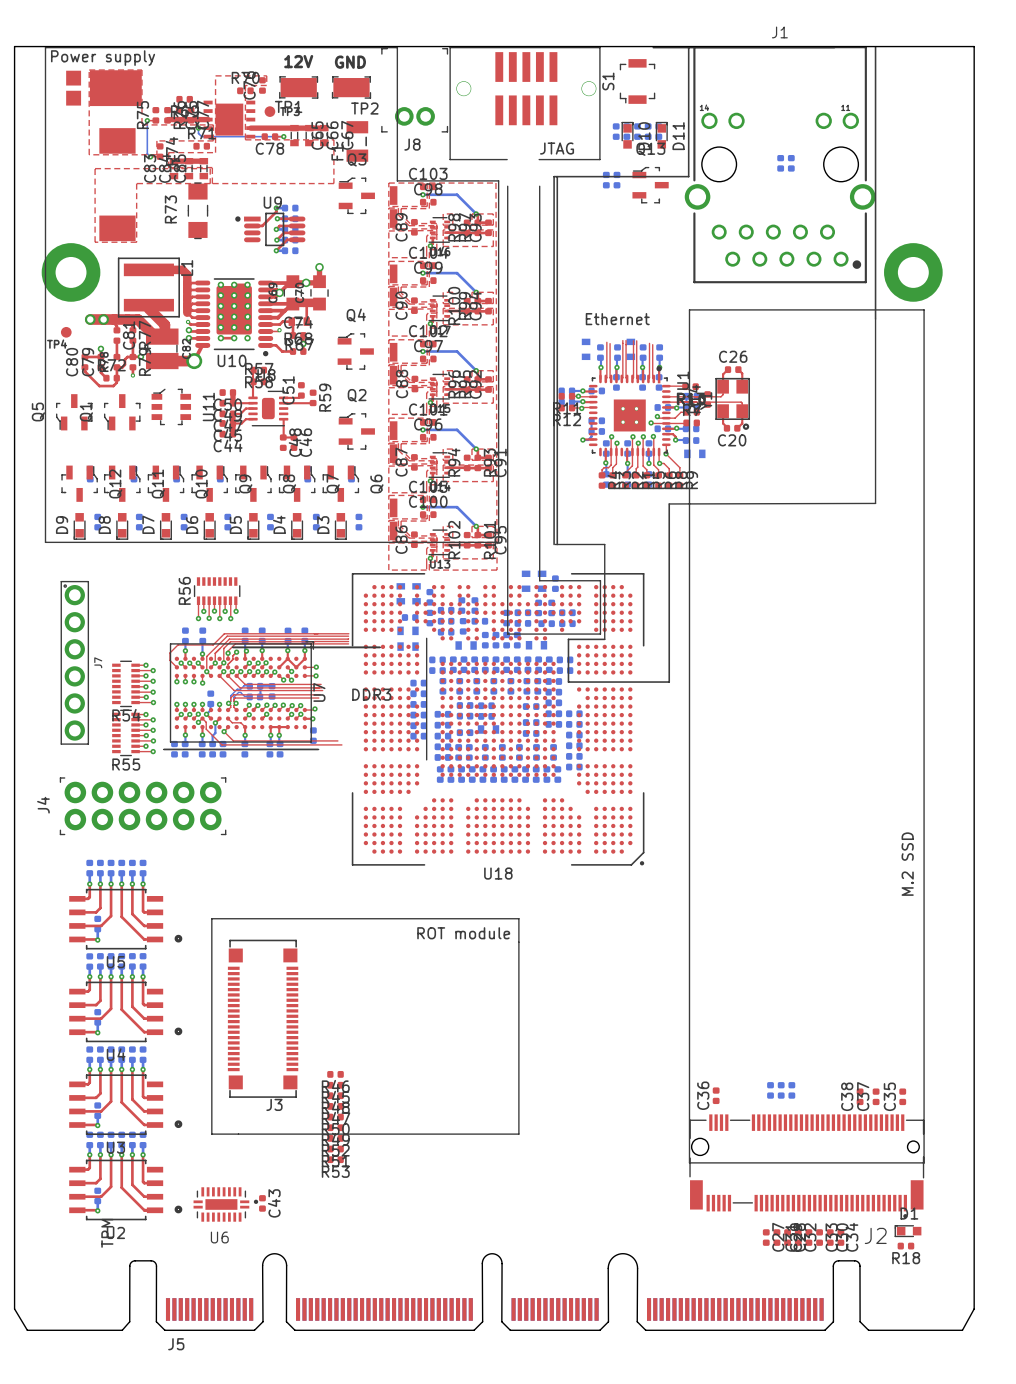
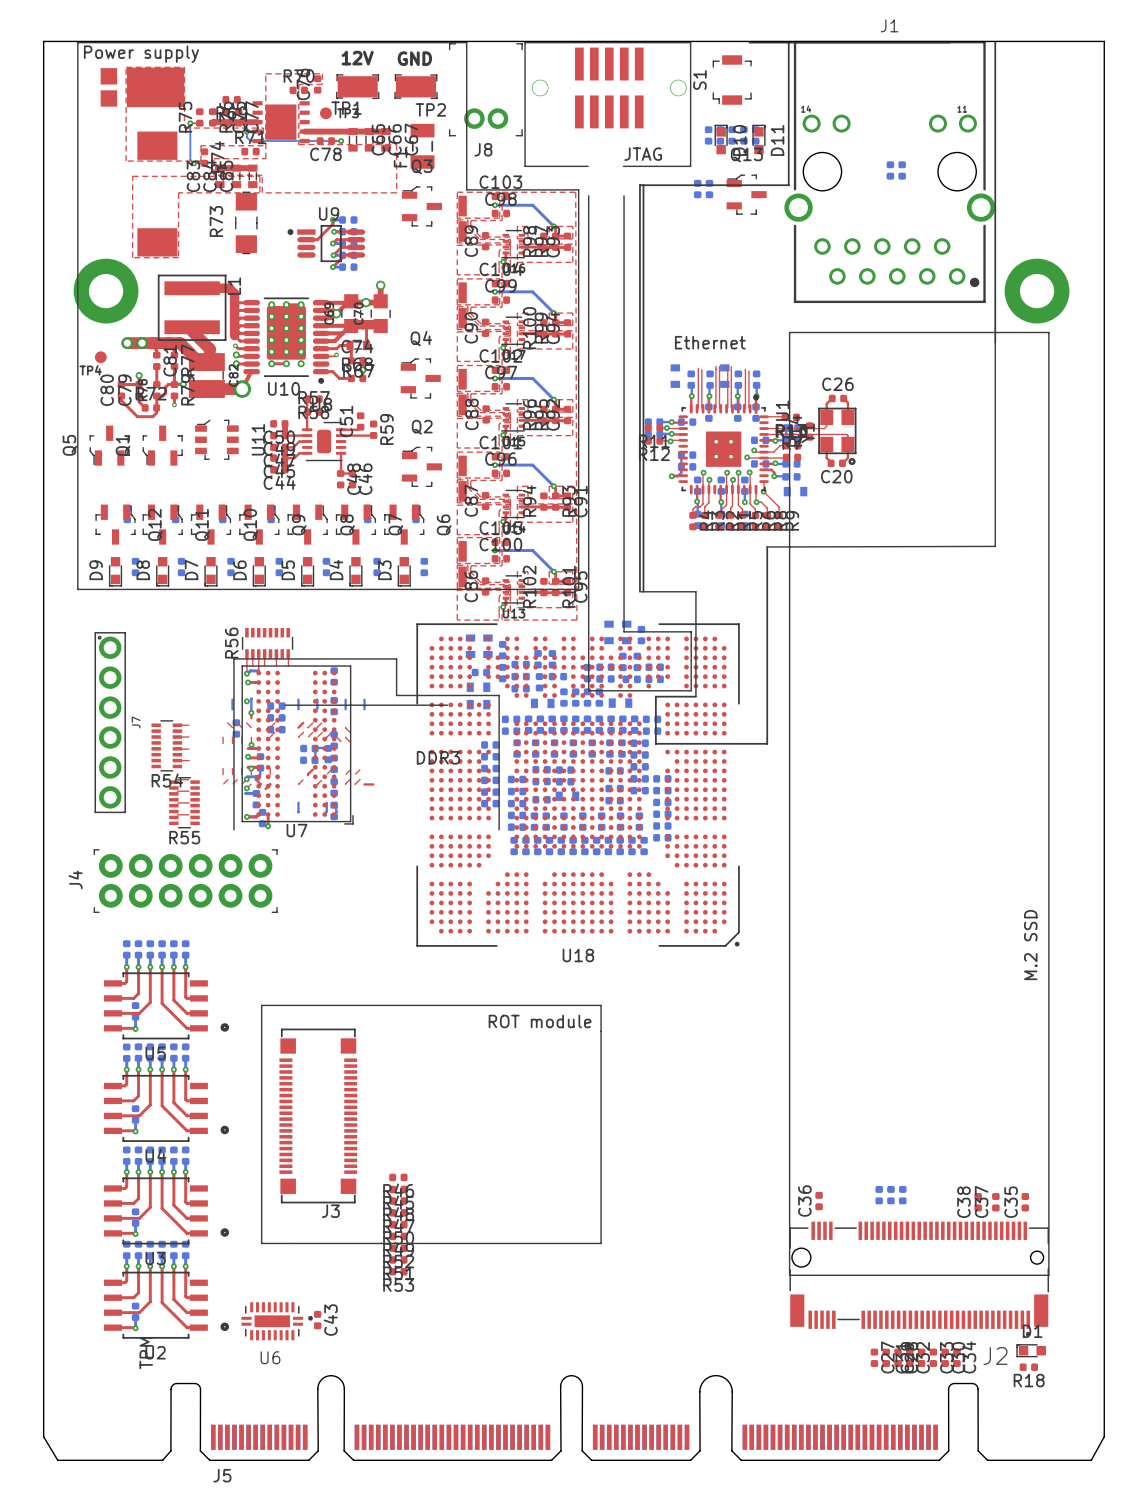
top track: (219, 601) (219, 618) -> none
top track: (230, 601) (230, 618) -> none
via: (203, 611) -> none
via: (214, 611) -> none
via: (225, 611) -> none
via: (236, 611) -> none
bottom track: none -> (258, 670) (250, 670) (248, 673)
via: (209, 618) -> none
via: (219, 618) -> none
via: (230, 618) -> none
part: none -> (334, 676)
top track: none -> (248, 682) (258, 682)
via: none -> (248, 682)
top track: (348, 633) (224, 633) (213, 644) (177, 644) (169, 652) (169, 660) (176, 667) -> none
part: (185, 635) -> none
part: (202, 635) -> none
part: (245, 635) -> none
part: (262, 635) -> none
part: (288, 635) -> none
part: (304, 635) -> none
top track: (348, 636) (227, 636) (206, 656) (206, 671) (211, 675) -> none
top track: (348, 638) (229, 639) (215, 653) (215, 663) (210, 667) -> none
line: none -> (499, 695) (396, 695) (396, 658) (233, 658) (233, 829)
top track: (348, 641) (230, 641) (223, 648) (223, 662) -> none
via: none -> (246, 701)
top track: (348, 643) (235, 643) (228, 651) (228, 658) -> none
part: none -> (276, 706)
part: none -> (334, 706)
top track: (185, 650) (185, 658) -> none
via: (185, 650) -> none
top track: (245, 650) (245, 658) -> none
top track: (262, 650) (262, 658) -> none
via: (262, 650) -> none
top track: (287, 650) (287, 658) -> none
via: (287, 650) -> none
top track: (304, 650) (304, 658) (296, 667) (287, 658) -> none
via: (304, 650) -> none
via: (246, 651) -> none
top track: (236, 652) (232, 655) (232, 659) -> none
via: (236, 652) -> none
via: (228, 653) -> none
part: none -> (276, 717)
top track: (287, 658) (279, 667) -> none
top track: (232, 659) (228, 664) (228, 667) -> none
via: (223, 662) -> none
via: (266, 662) -> none
via: (181, 663) -> none
via: (189, 663) -> none
via: (198, 663) -> none
via: (215, 663) -> none
via: (249, 663) -> none
via: (258, 663) -> none
via: (145, 665) -> none
top track: (304, 667) (316, 667) -> none
via: (316, 667) -> none
part: none -> (236, 728)
part: none -> (276, 729)
top track: (135, 670) (153, 670) -> none
via: (153, 670) -> none
via: (206, 671) -> none
via: (223, 671) -> none
top track: (232, 671) (228, 675) (240, 687) (321, 687) -> none
via: (232, 671) -> none
top track: (240, 671) (236, 675) (245, 684) (321, 684) -> none
via: (240, 671) -> none
via: (249, 671) -> none
via: (258, 671) -> none
via: (266, 671) -> none
via: (291, 671) -> none
via: (274, 672) -> none
via: (145, 675) -> none
top track: (219, 675) (234, 690) (322, 690) -> none
top track: (304, 675) (316, 675) -> none
via: (316, 675) -> none
part: none -> (334, 740)
via: (283, 680) -> none
via: (291, 680) -> none
top track: (135, 681) (153, 681) -> none
via: (153, 681) -> none
via: (176, 681) -> none
via: (185, 681) -> none
via: (193, 681) -> none
bottom track: (250, 685) (244, 685) (240, 689) (237, 689) (230, 695) (228, 703) -> none
via: (145, 686) -> none
top track: none -> (248, 748) (258, 748)
U7 rotation: 0° (241, 691) -> 90° clockwise (297, 744)
top track: (135, 692) (153, 692) -> none
via: (153, 692) -> none
top track: none -> (248, 756) (258, 757)
via: none -> (248, 756)
top track: (320, 694) (233, 694) (228, 703) (230, 707) (228, 710) -> none
bottom track: (250, 696) (244, 696) (238, 692) (233, 697) (236, 703) -> none
via: (146, 697) -> none
top track: (318, 698) (235, 698) (233, 701) (236, 703) (233, 707) (236, 710) -> none
part: none -> (334, 763)
top track: (135, 702) (153, 702) -> none
via: (153, 702) -> none
top track: none -> (248, 767) (258, 767)
via: (228, 703) -> none
via: (236, 703) -> none
via: (176, 704) -> none
via: (185, 704) -> none
via: (193, 704) -> none
via: (219, 704) -> none
via: (249, 705) -> none
via: (257, 705) -> none
top track: (266, 705) (262, 710) -> none
via: (266, 705) -> none
via: (275, 705) -> none
via: (283, 705) -> none
via: (292, 705) -> none
via: (300, 705) -> none
top track: (249, 706) (245, 710) -> none
top track: (283, 706) (279, 710) -> none
via: (314, 708) -> none
top track: (304, 710) (314, 710) -> none
bottom track: none -> (246, 776) (256, 776) (258, 779)
via: (145, 714) -> none
via: (181, 714) -> none
via: (189, 714) -> none
via: (206, 714) -> none
via: (249, 714) -> none
via: (266, 714) -> none
via: (291, 714) -> none
via: (300, 714) -> none
top track: (202, 718) (206, 722) (206, 729) (221, 744) (341, 744) -> none
top track: (228, 718) (232, 722) (240, 722) (245, 727) -> none
via: (312, 718) -> none
top track: (135, 719) (153, 719) -> none
via: (153, 719) -> none
part: none -> (334, 787)
bottom track: (215, 722) (212, 744) -> none
via: (215, 722) -> none
via: (145, 724) -> none
bottom track: none -> (245, 793) (256, 793)
top track: (185, 727) (185, 735) -> none
top track: (202, 727) (202, 735) -> none
top track: (228, 727) (224, 731) (233, 740) (337, 740) -> none
top track: (245, 727) (245, 735) -> none
top track: (270, 727) (287, 727) -> none
top track: (270, 727) (270, 735) -> none
top track: (279, 727) (279, 735) -> none
top track: (135, 730) (153, 730) -> none
via: (153, 730) -> none
via: (224, 731) -> none
R55 position: (125, 732) -> (184, 802)
part: none -> (256, 799)
via: (146, 735) -> none
bottom track: (185, 735) (185, 744) -> none
via: (185, 735) -> none
bottom track: (202, 735) (202, 744) -> none
via: (202, 735) -> none
via: (245, 735) -> none
via: (270, 735) -> none
via: (279, 735) -> none
part: (313, 735) -> none
top track: (135, 740) (153, 740) -> none
via: (153, 740) -> none
part: none -> (334, 810)
via: (145, 746) -> none
top track: none -> (258, 814) (256, 816) (246, 816)
top track: none -> (268, 814) (268, 826)
via: none -> (246, 816)
line: (163, 749) (318, 749) -> none
part: (174, 749) -> none
part: (185, 749) -> none
part: (202, 749) -> none
part: (223, 749) -> none
part: (244, 749) -> none
part: (269, 749) -> none
part: (280, 749) -> none
top track: (135, 751) (153, 751) -> none
via: (153, 751) -> none
via: none -> (268, 826)

